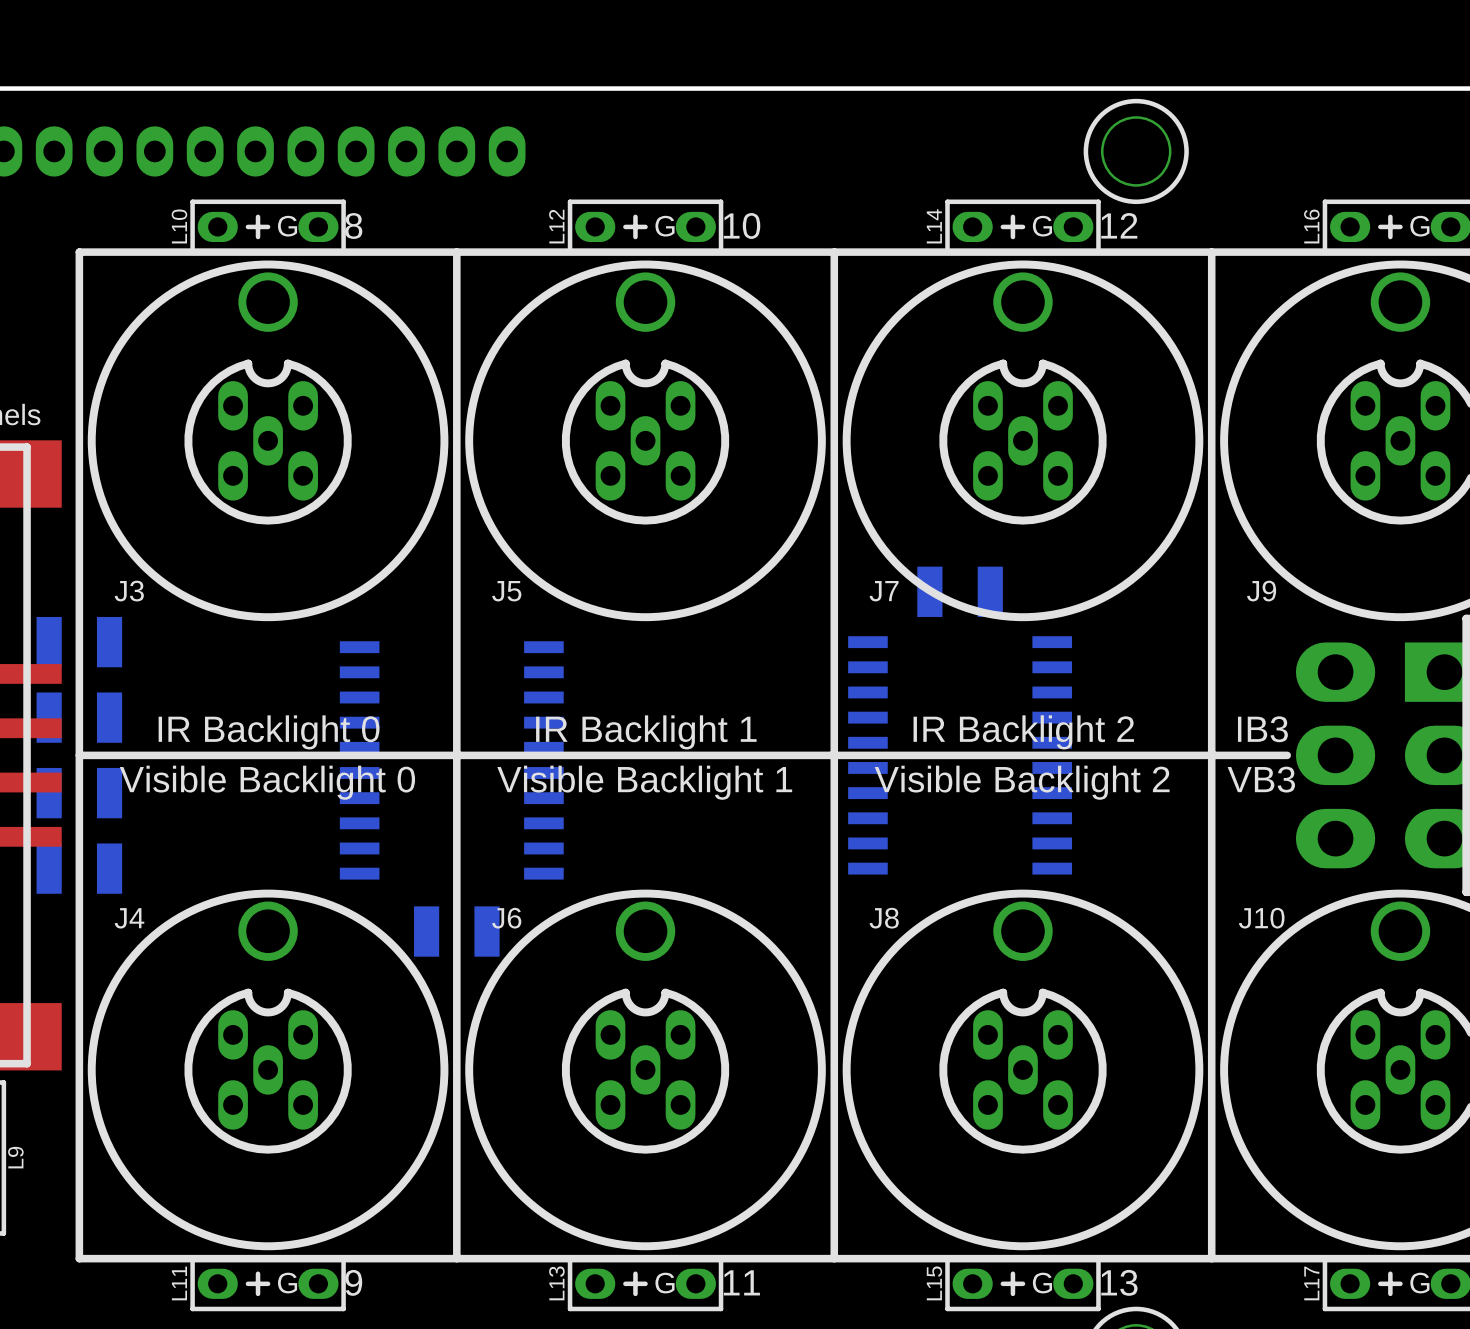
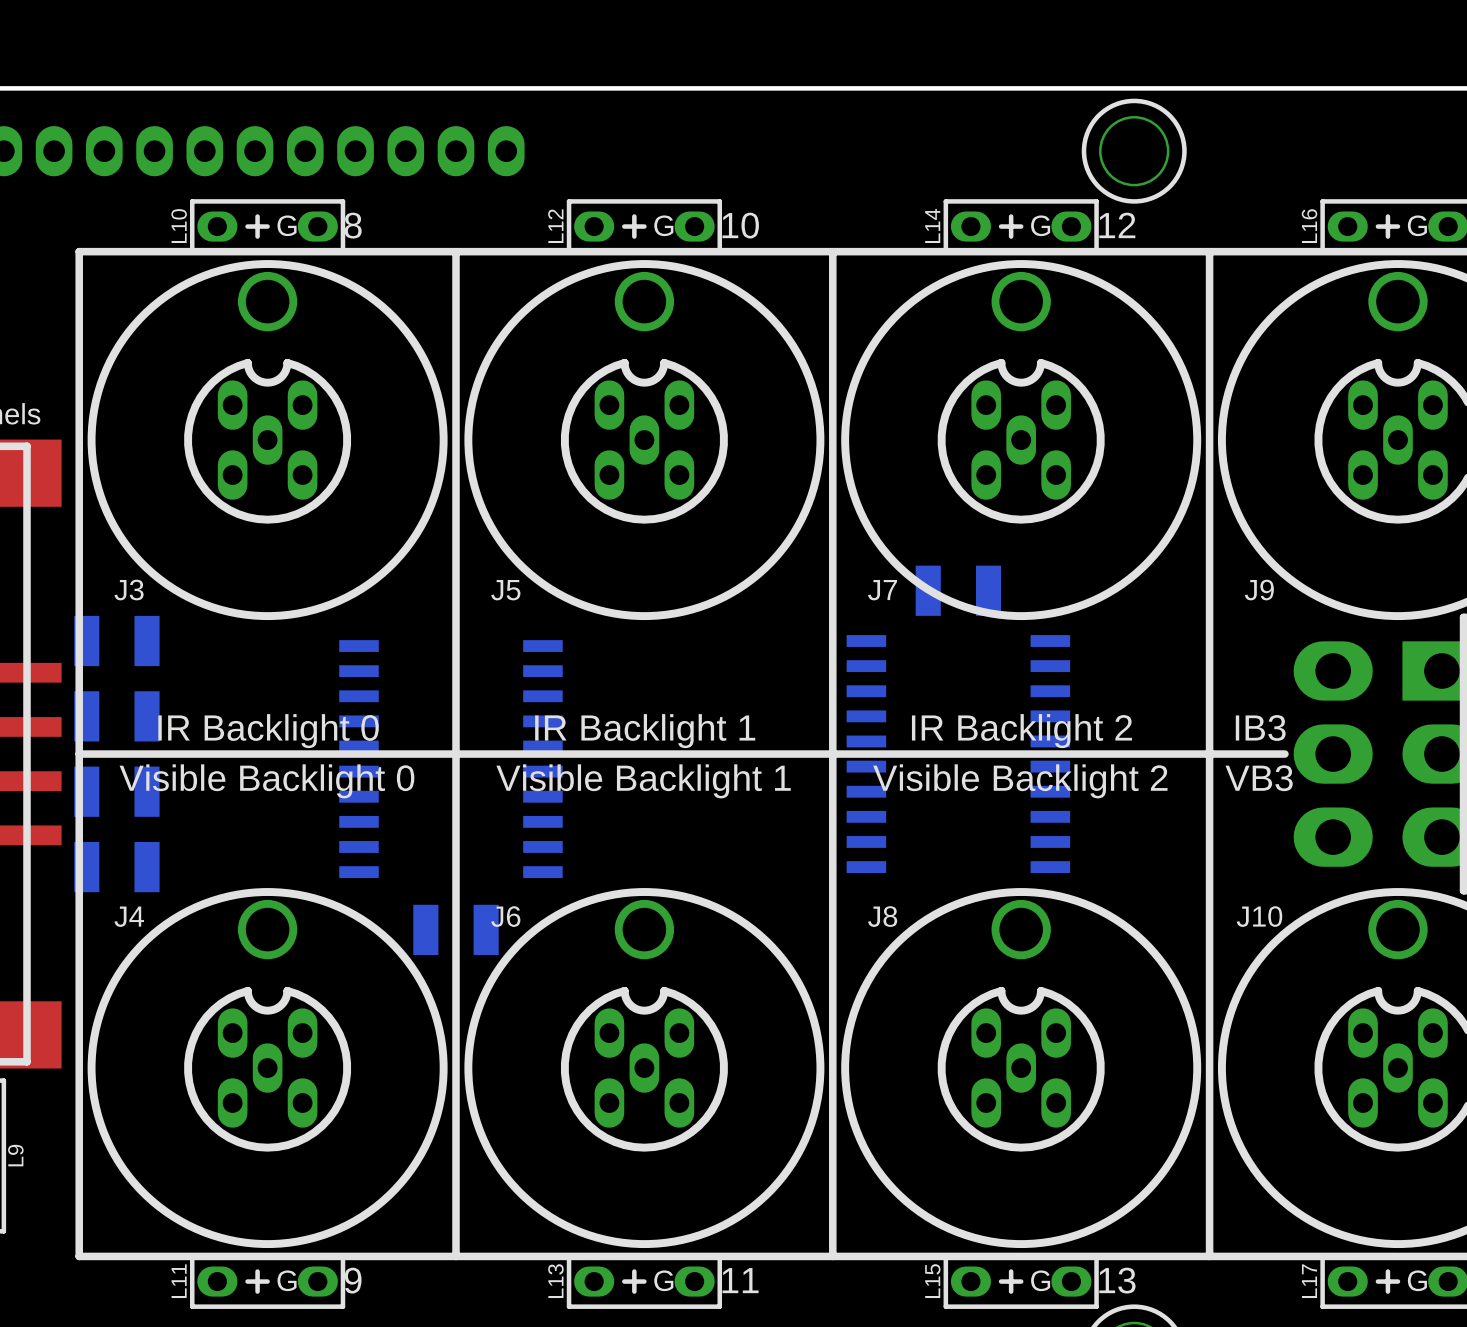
part position: (79, 642) -> (116, 641)
part position: (79, 717) -> (116, 716)
part position: (79, 793) -> (116, 791)
part position: (79, 868) -> (116, 867)

